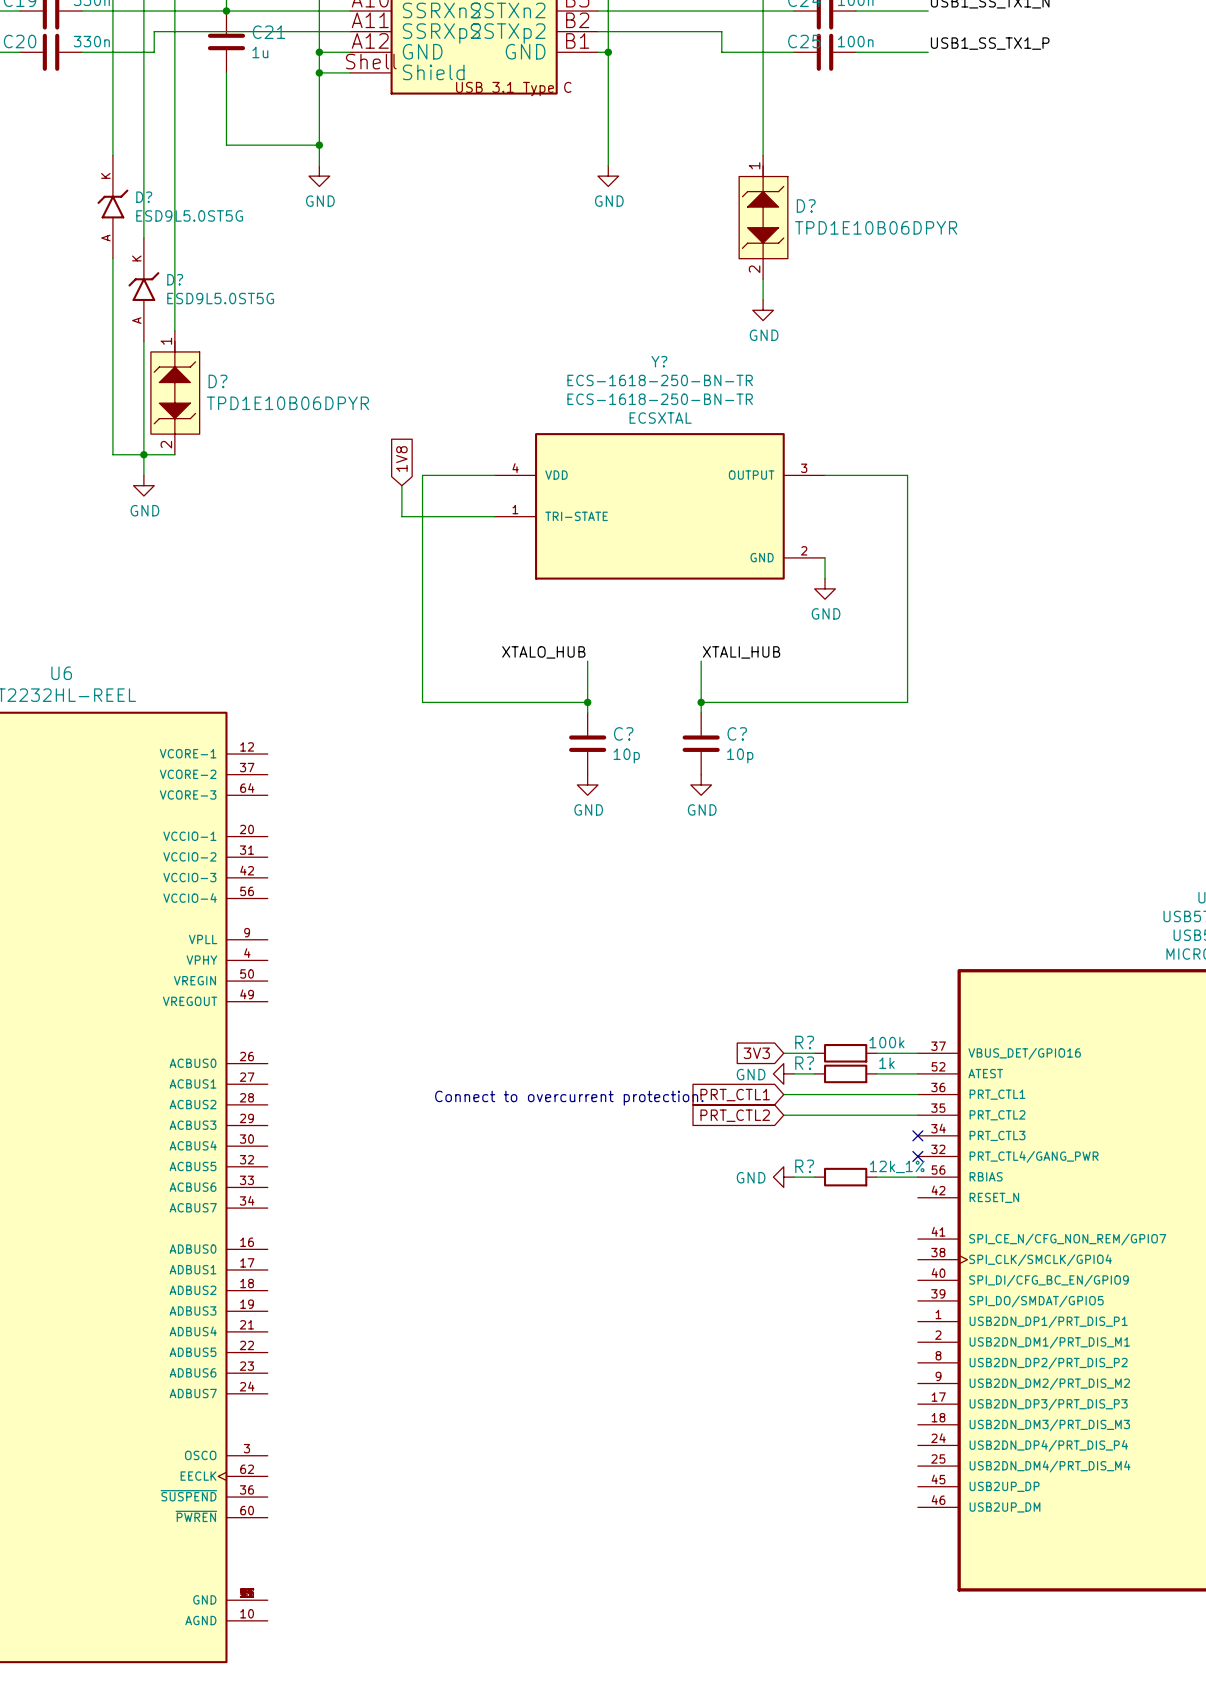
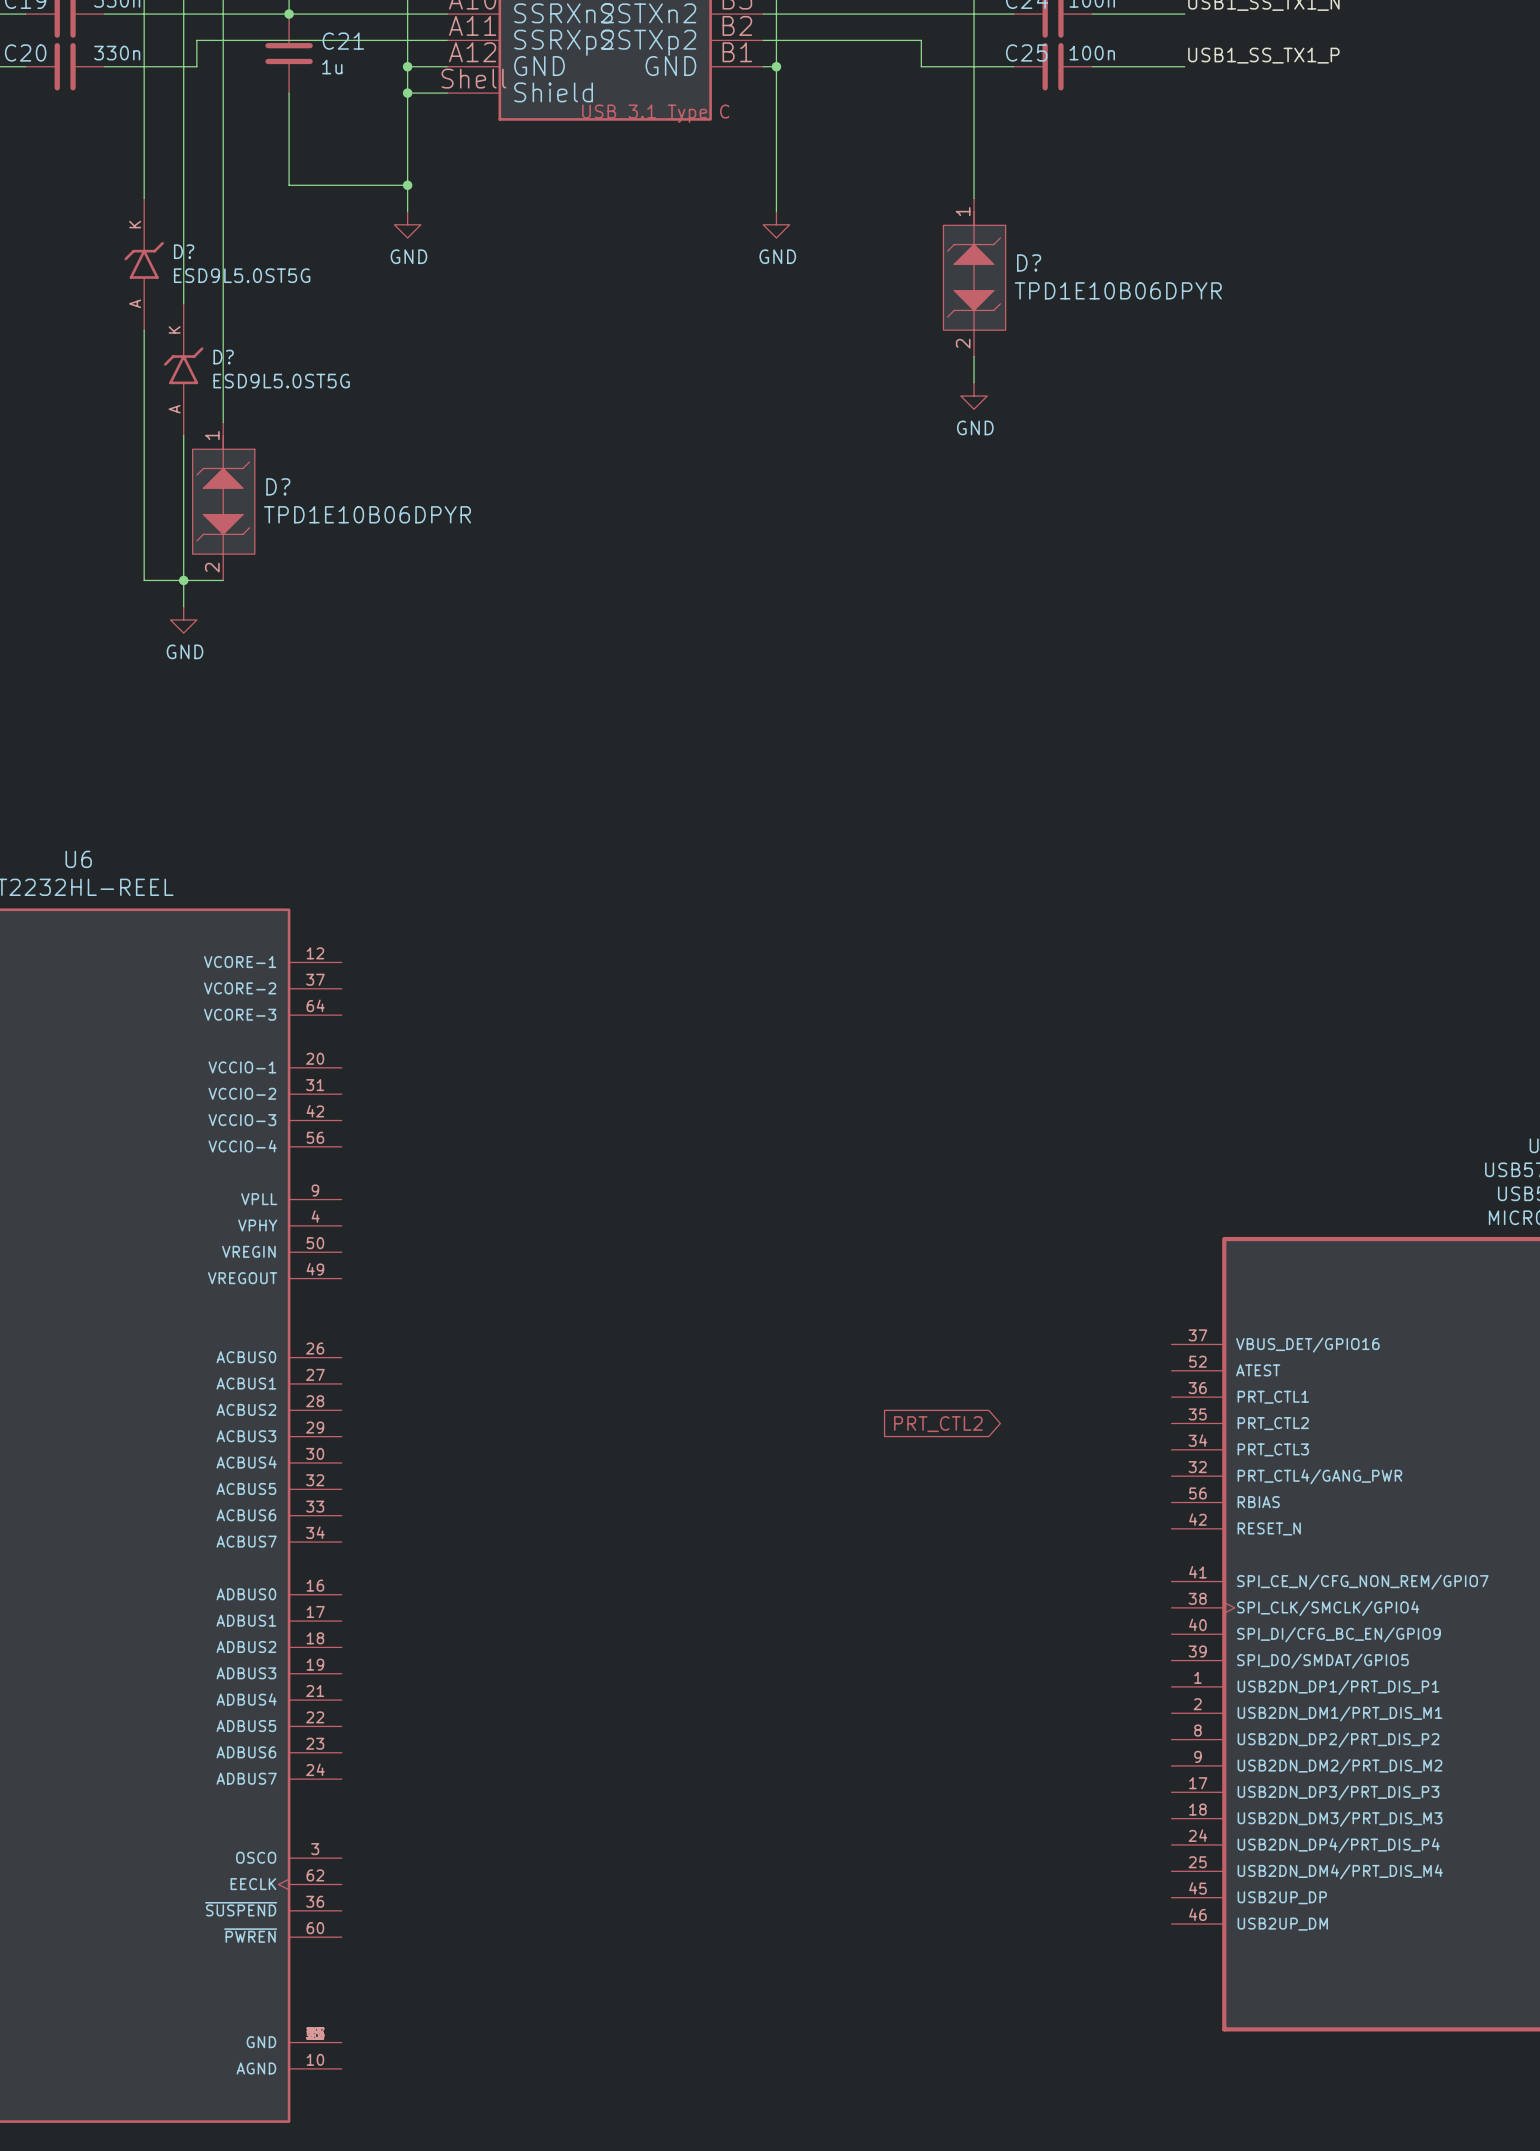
global label: 1V8 (401, 459) -> none
wire: (494, 475) (422, 475) (422, 702) (587, 702) -> none
wire: (825, 475) (907, 475) (907, 702) (701, 702) -> none
wire: (401, 485) (401, 516) (494, 516) -> none
Y?: ECS-1618-250-BN-TR (659, 506) -> none
wire: (825, 557) (825, 578) -> none
power symbol: GND (825, 588) -> none
label: XTALO_HUB (543, 652) -> none
label: XTALI_HUB (741, 652) -> none
wire: (587, 661) (587, 712) -> none
wire: (701, 661) (701, 712) -> none
junction: (587, 702) -> none
junction: (701, 702) -> none
C?: (587, 743) -> none
C?: (701, 743) -> none
power symbol: GND (587, 784) -> none
power symbol: GND (701, 784) -> none
global label: 3V3 (756, 1053) -> none
wire: (783, 1053) (814, 1053) -> none
R?: (845, 1053) -> none
wire: (876, 1053) (917, 1053) -> none
power symbol: GND (783, 1073) -> none
wire: (794, 1073) (814, 1073) -> none
R?: (845, 1073) -> none
wire: (876, 1073) (917, 1073) -> none
wire: (783, 1094) (917, 1094) -> none
global label: PRT_CTL1 (735, 1095) -> none
text: Connect to overcurrent protection. (569, 1098) -> none
wire: (783, 1115) (917, 1115) -> none
no-connect mark: (917, 1135) -> none
no-connect mark: (917, 1156) -> none
power symbol: GND (783, 1177) -> none
wire: (794, 1177) (814, 1177) -> none
R?: (845, 1177) -> none
wire: (876, 1177) (917, 1177) -> none

